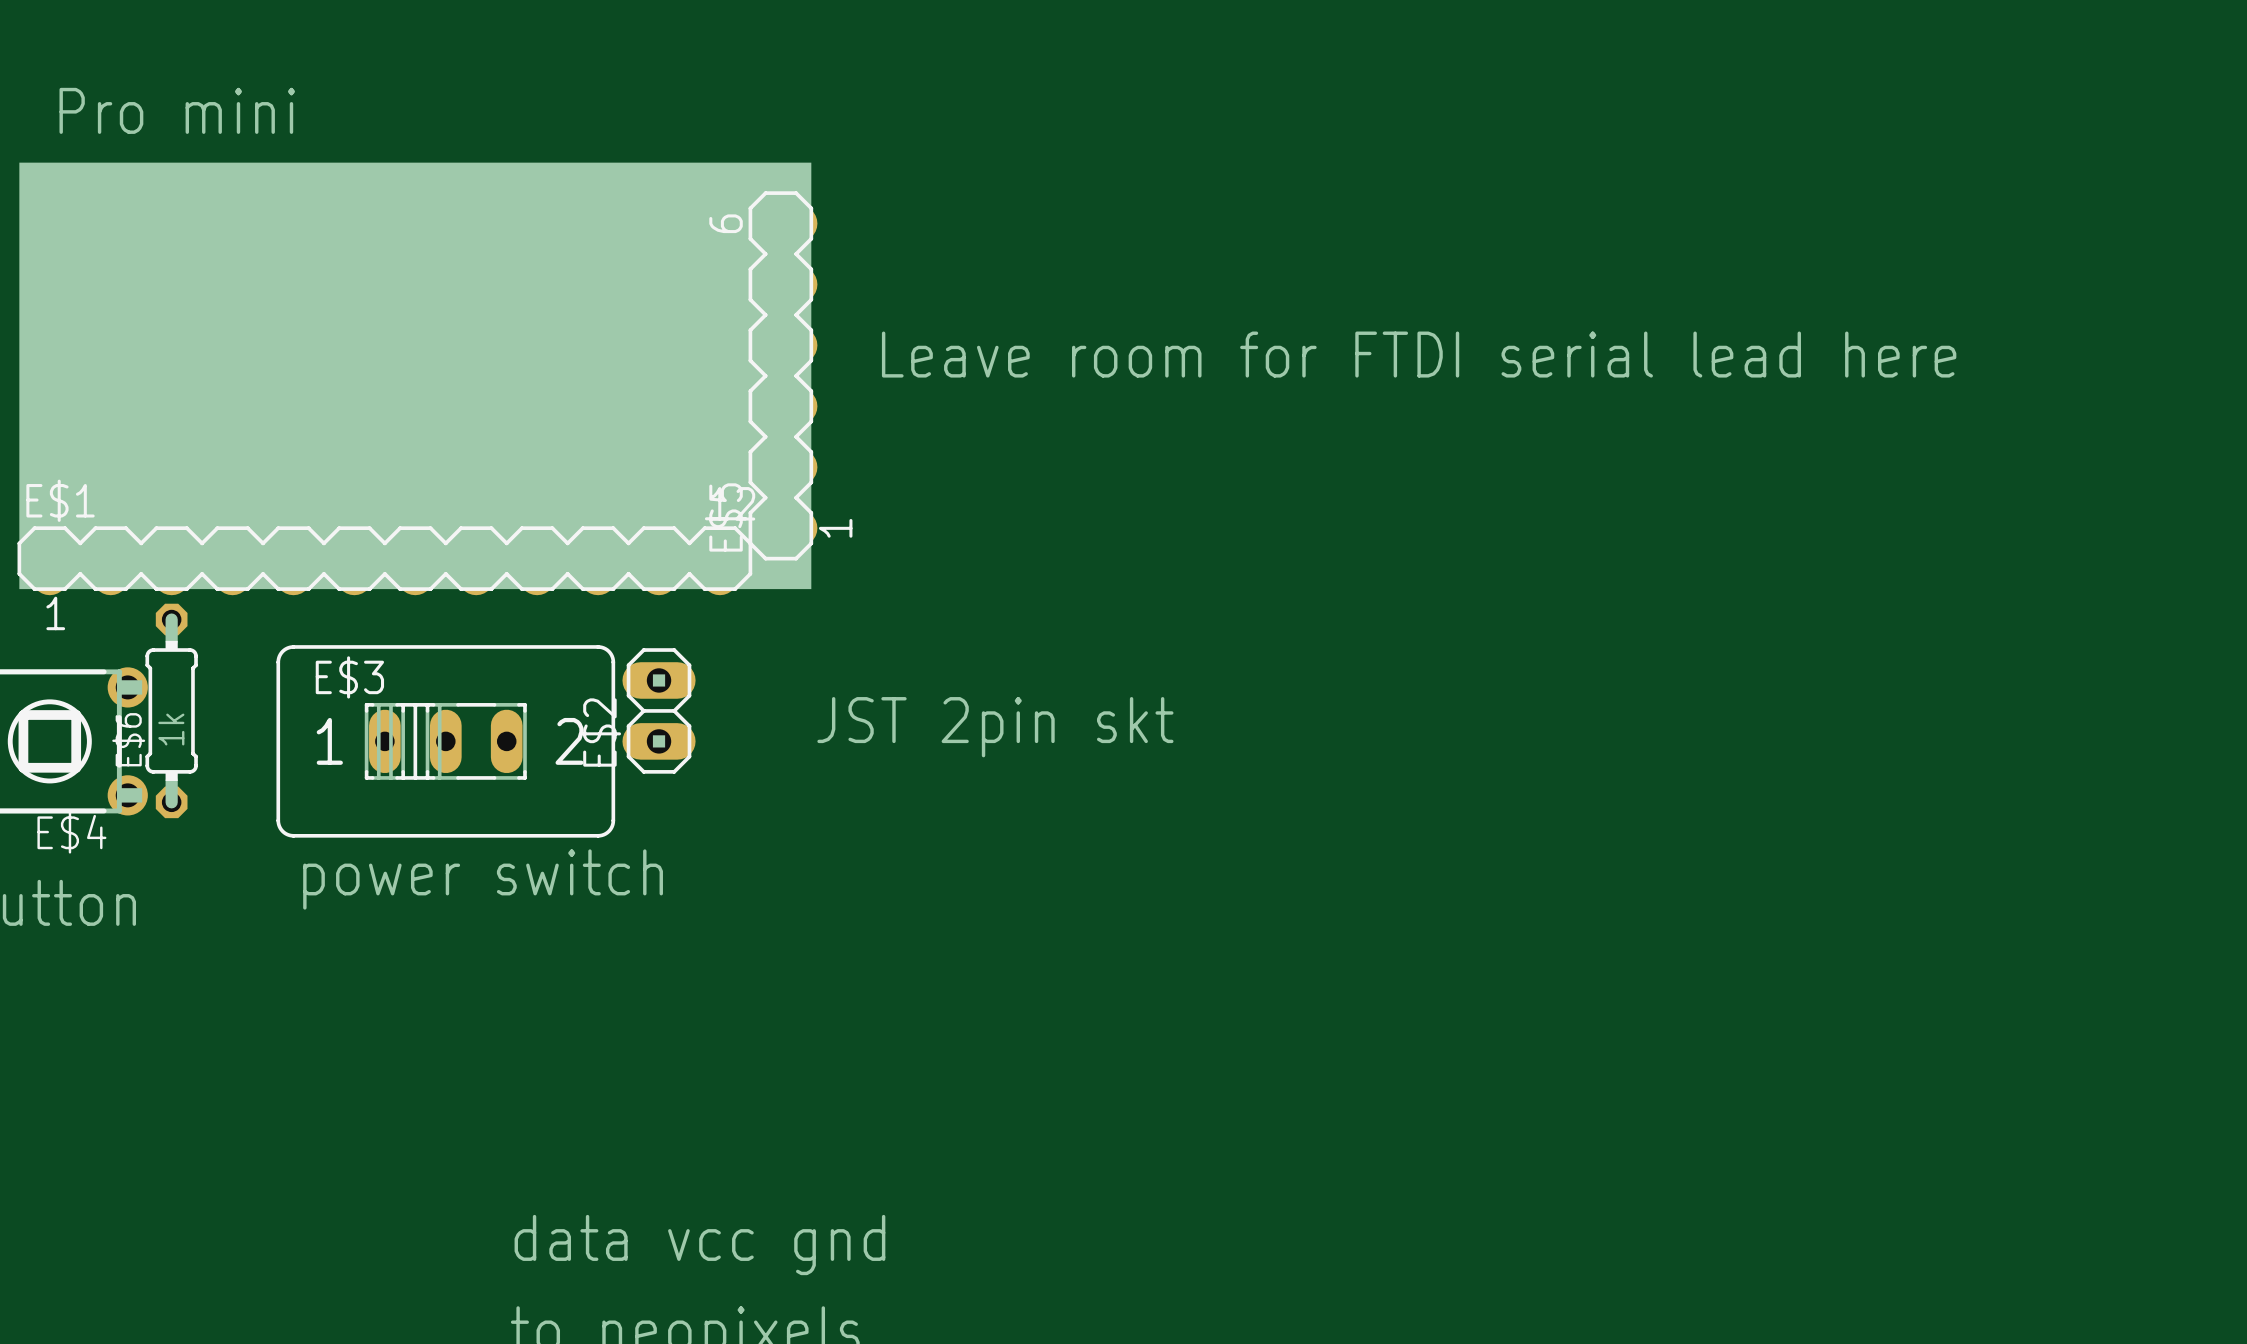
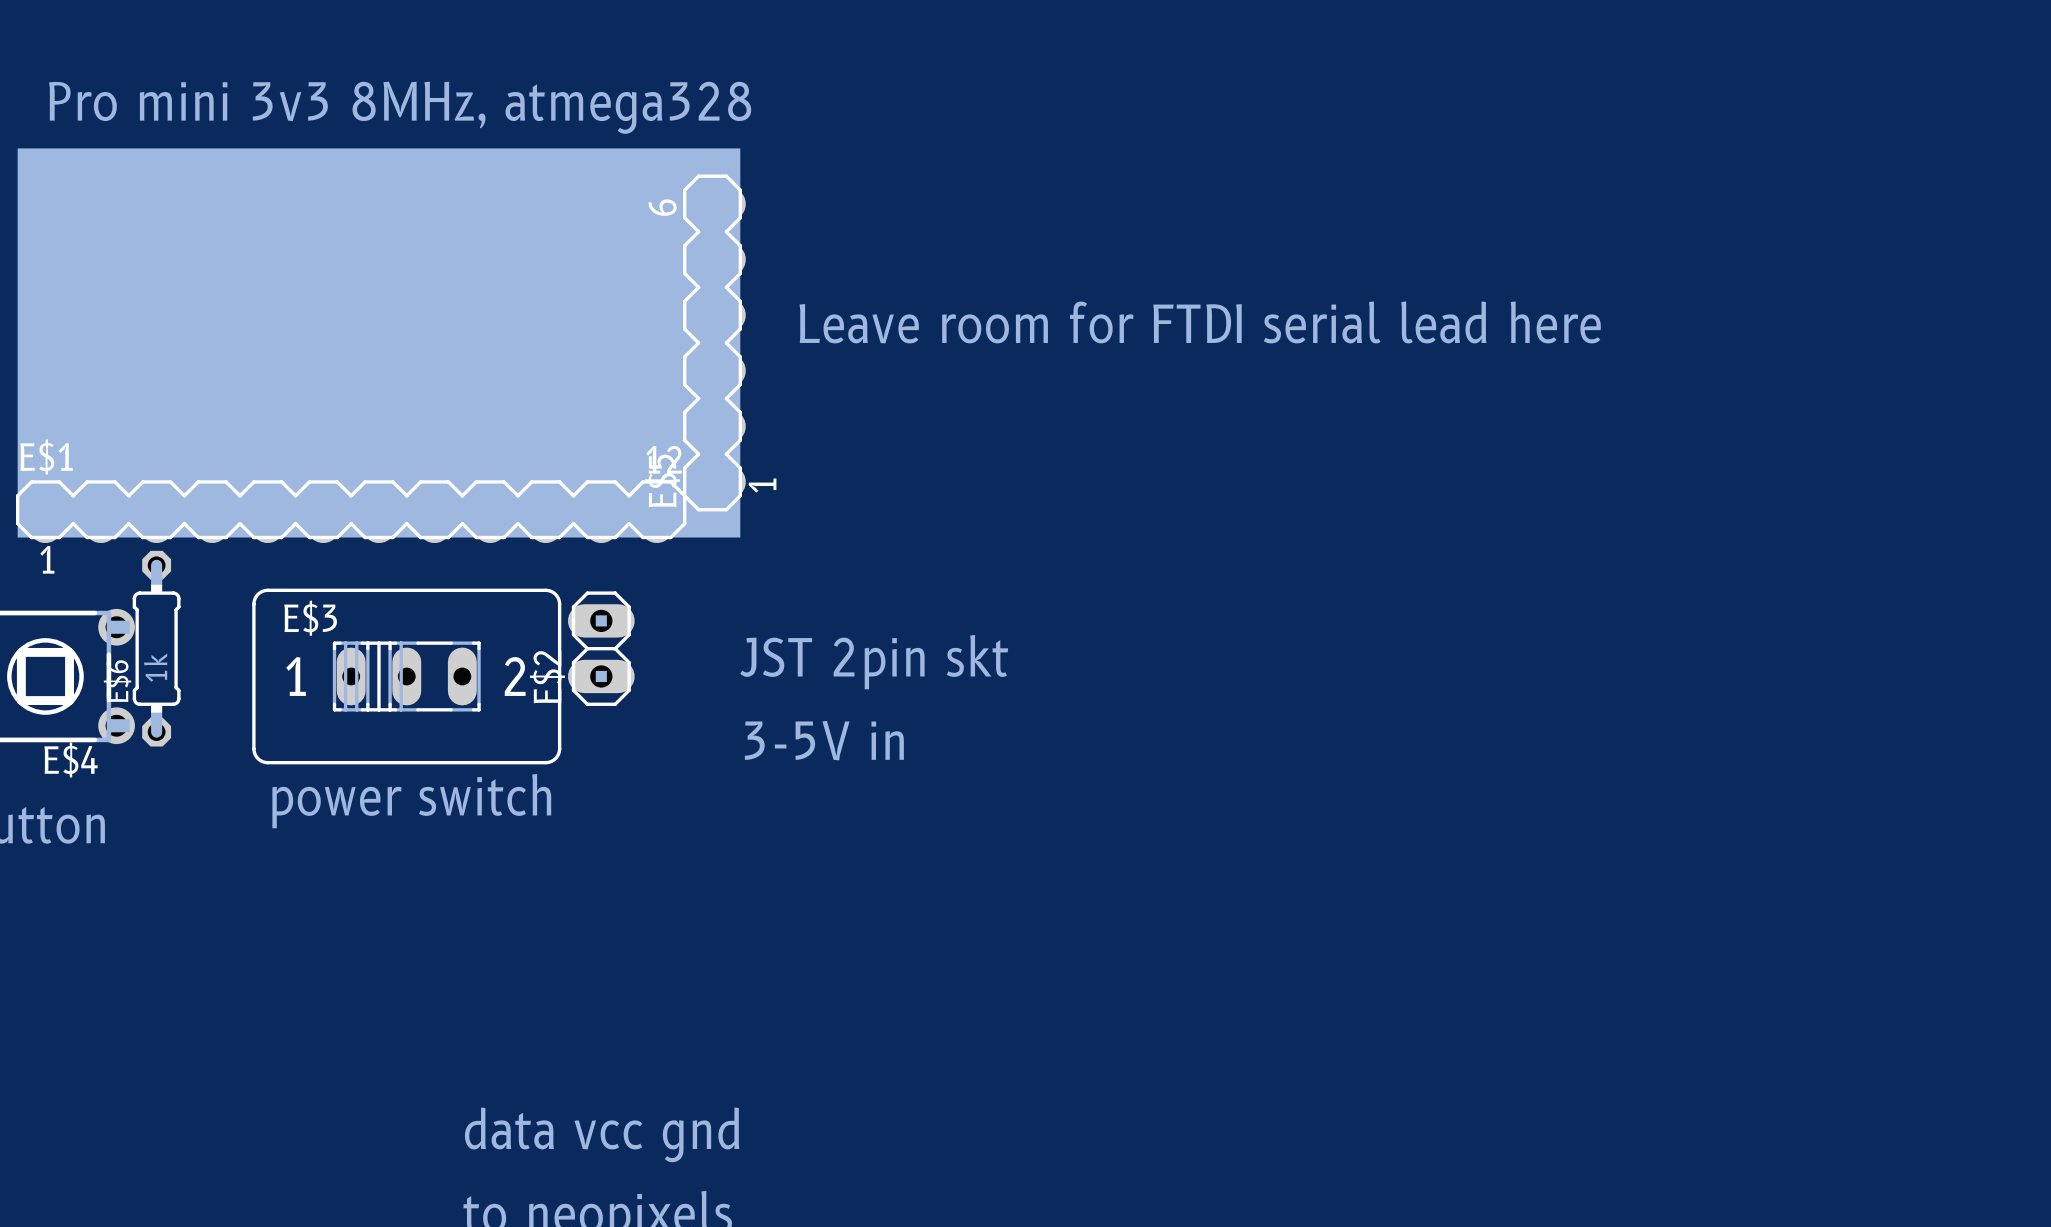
text: Pro mini (177, 110) -> Pro mini 3v3 8MHz, atmega328 (400, 107)
text: none -> 3-5V in (824, 740)

